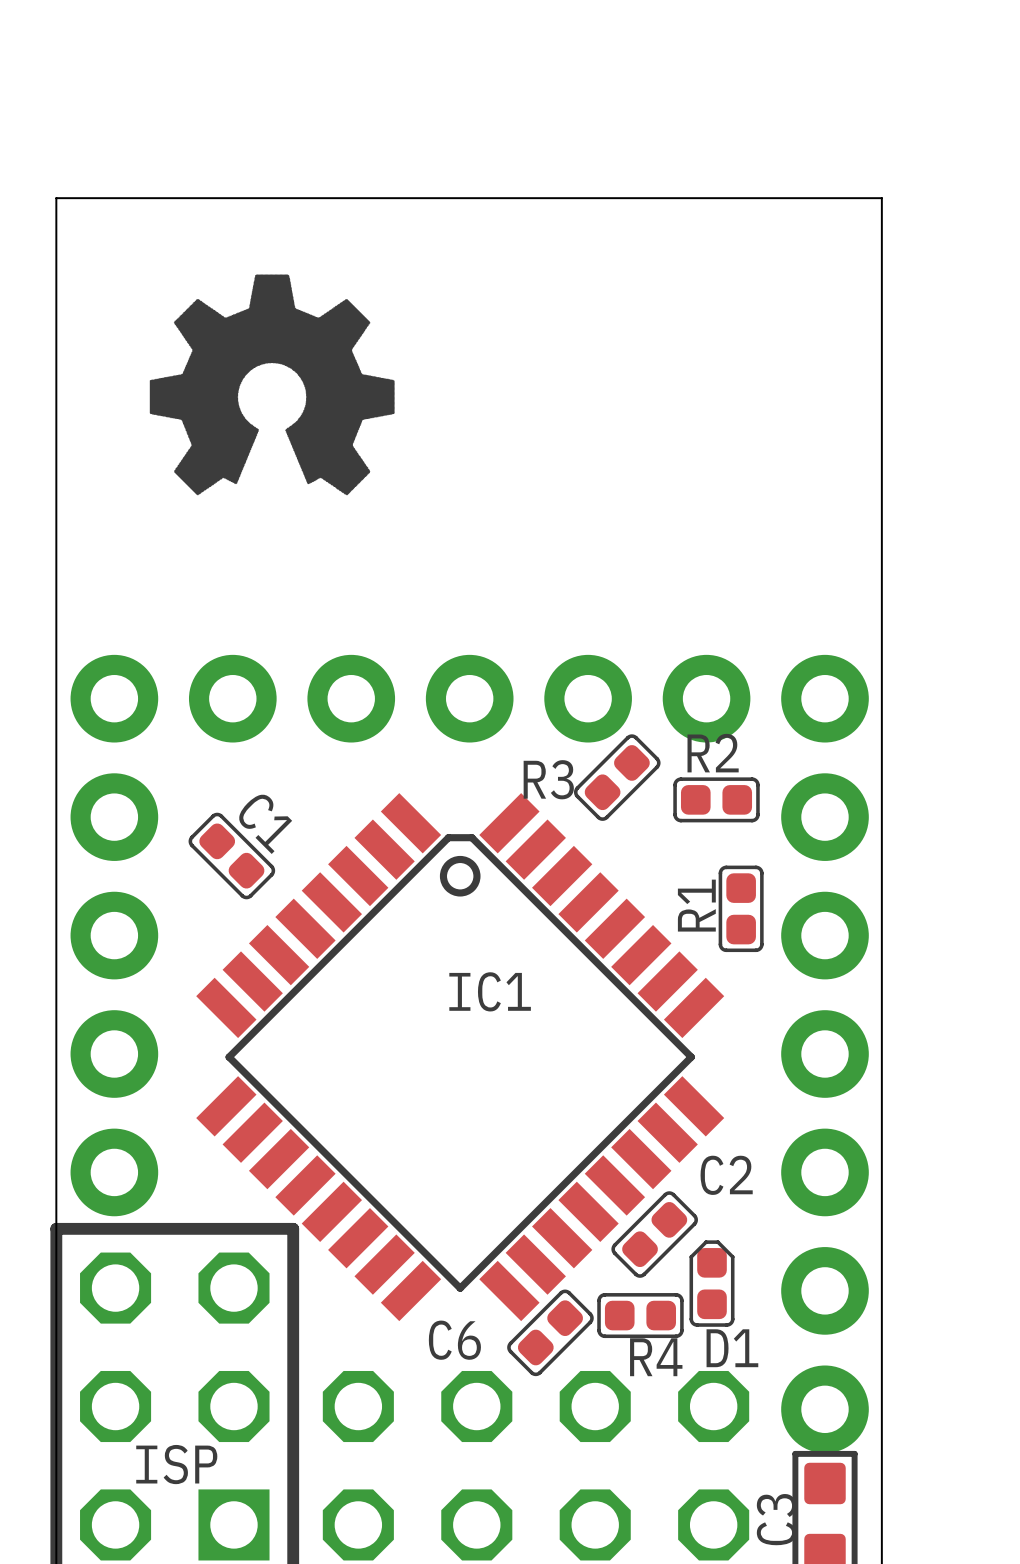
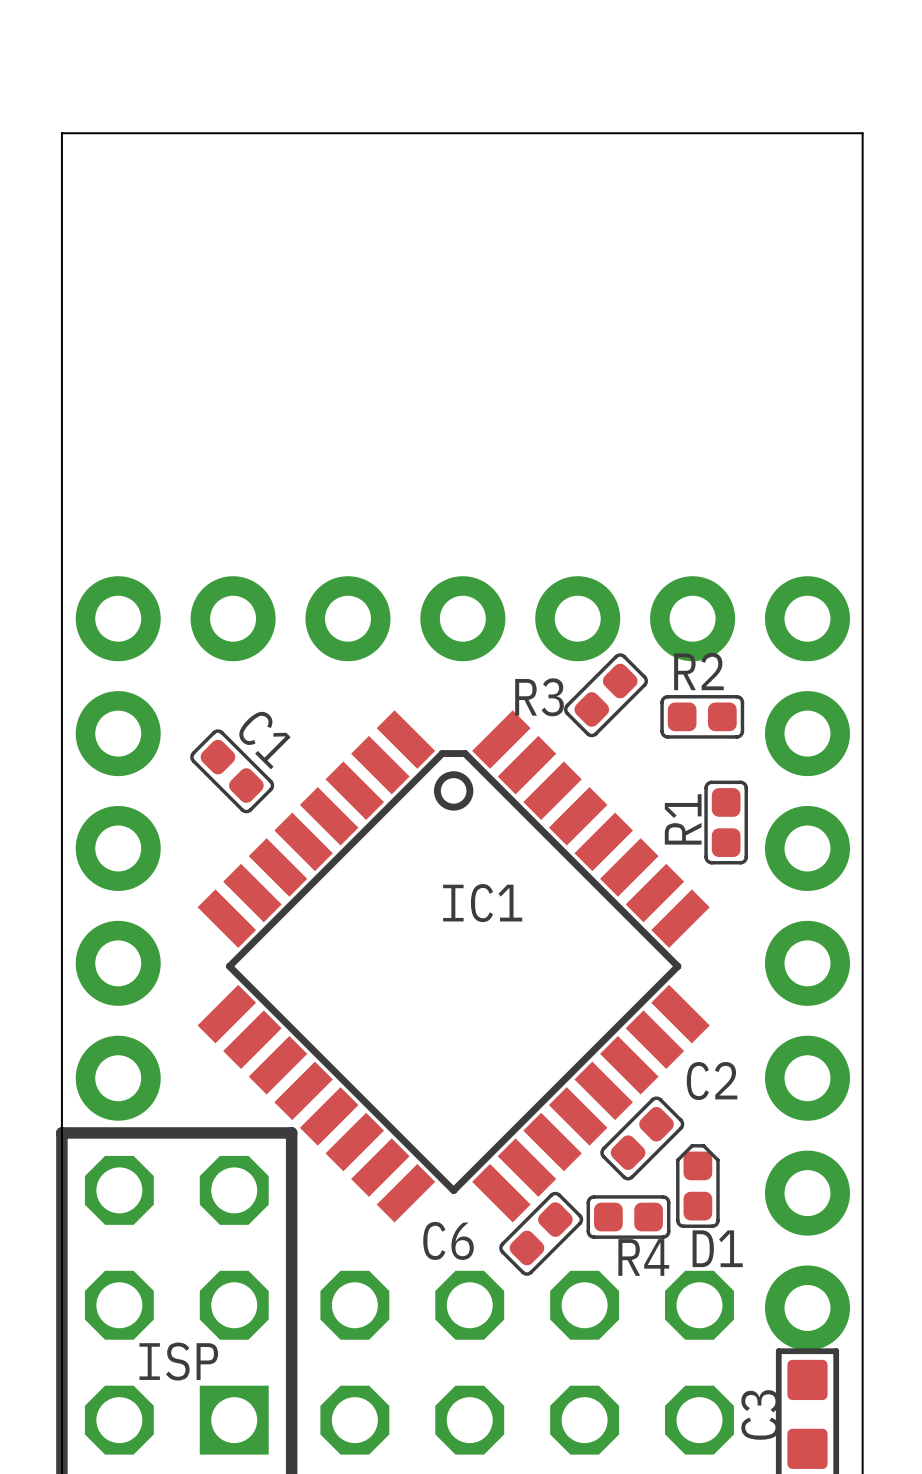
drawing: [149, 274, 395, 496] -> none

